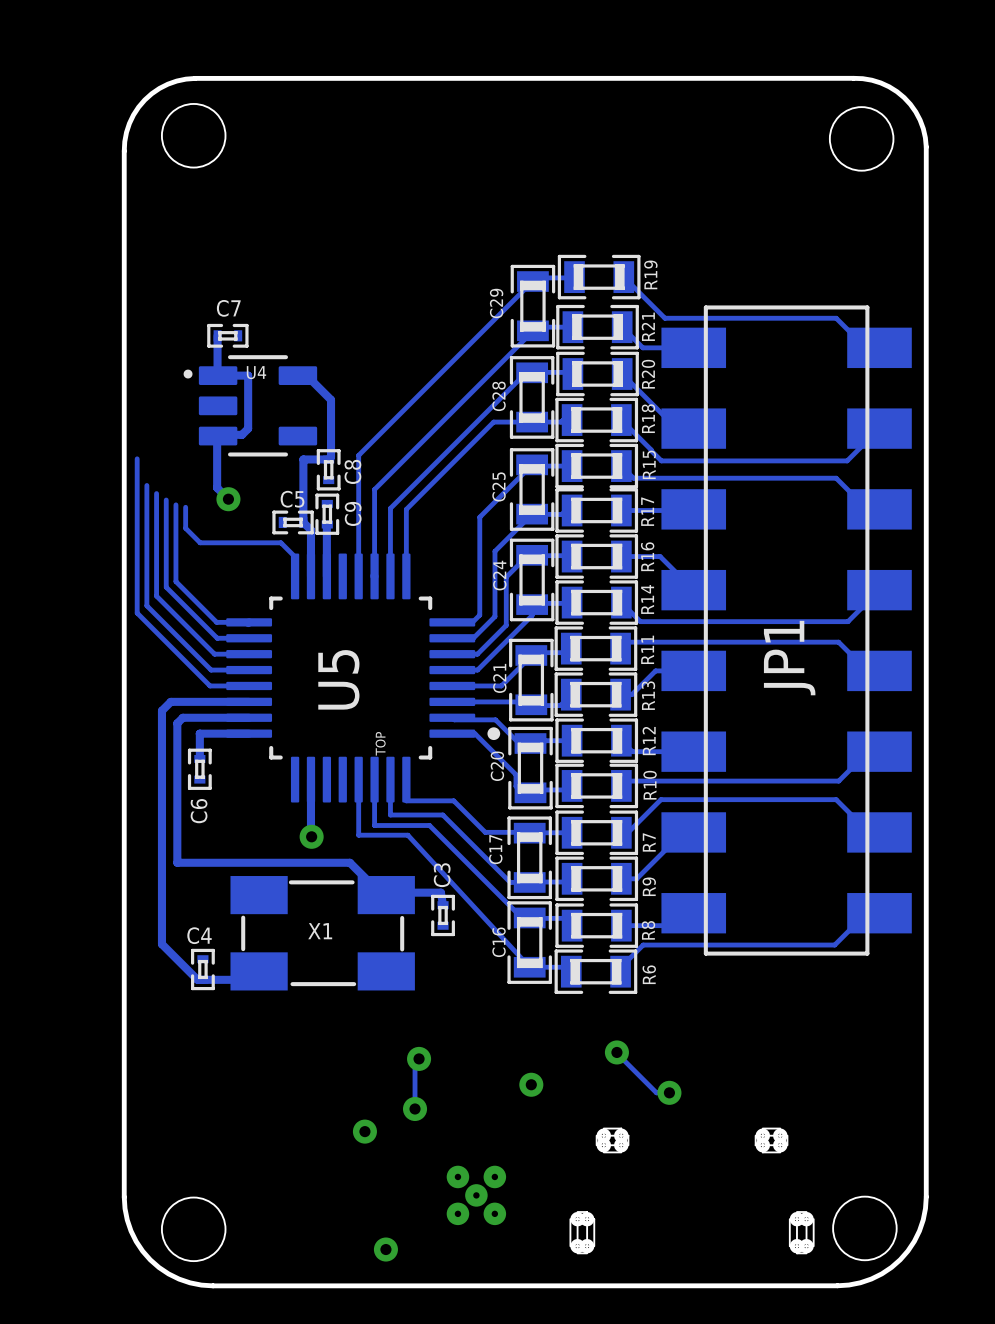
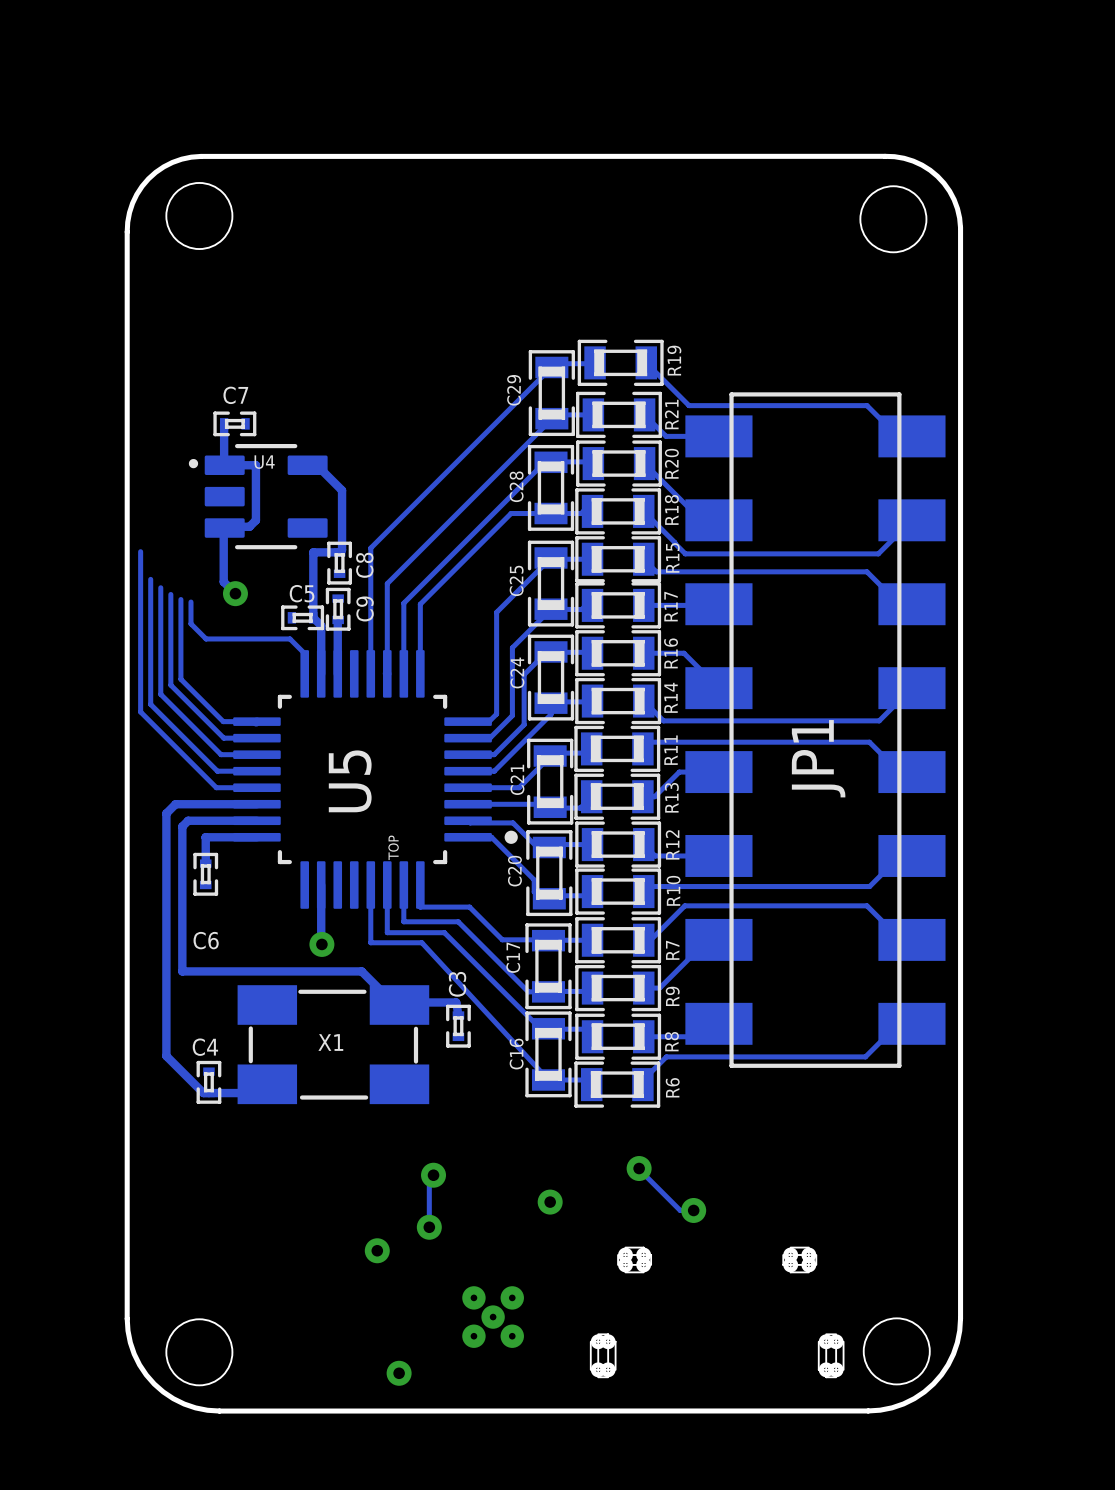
C6 name rotation: 0° (199, 811) -> 90° clockwise (206, 940)

